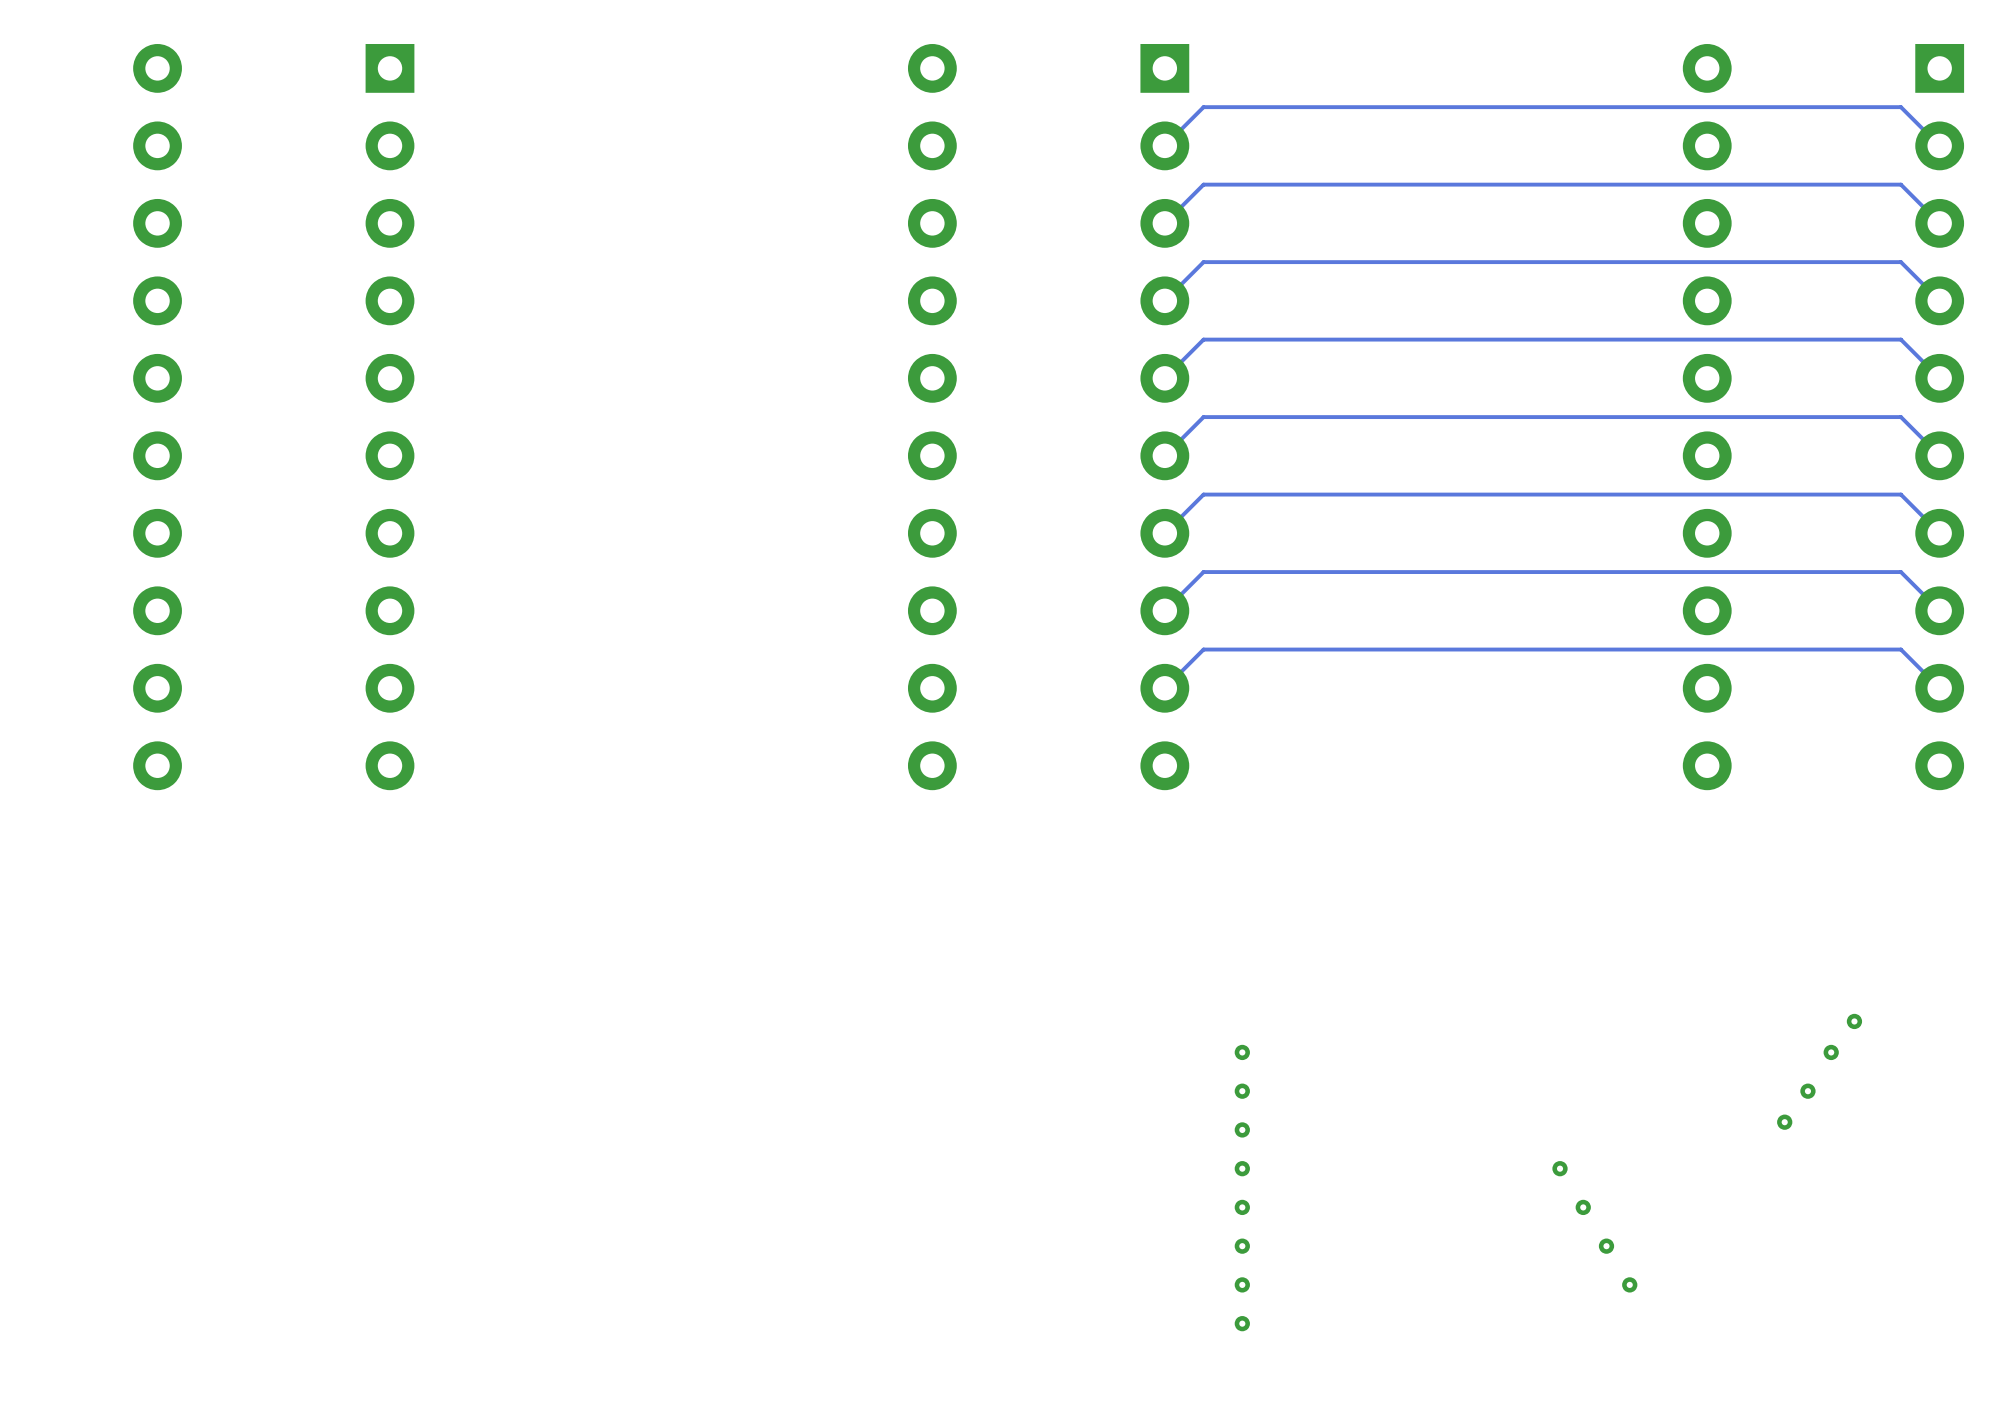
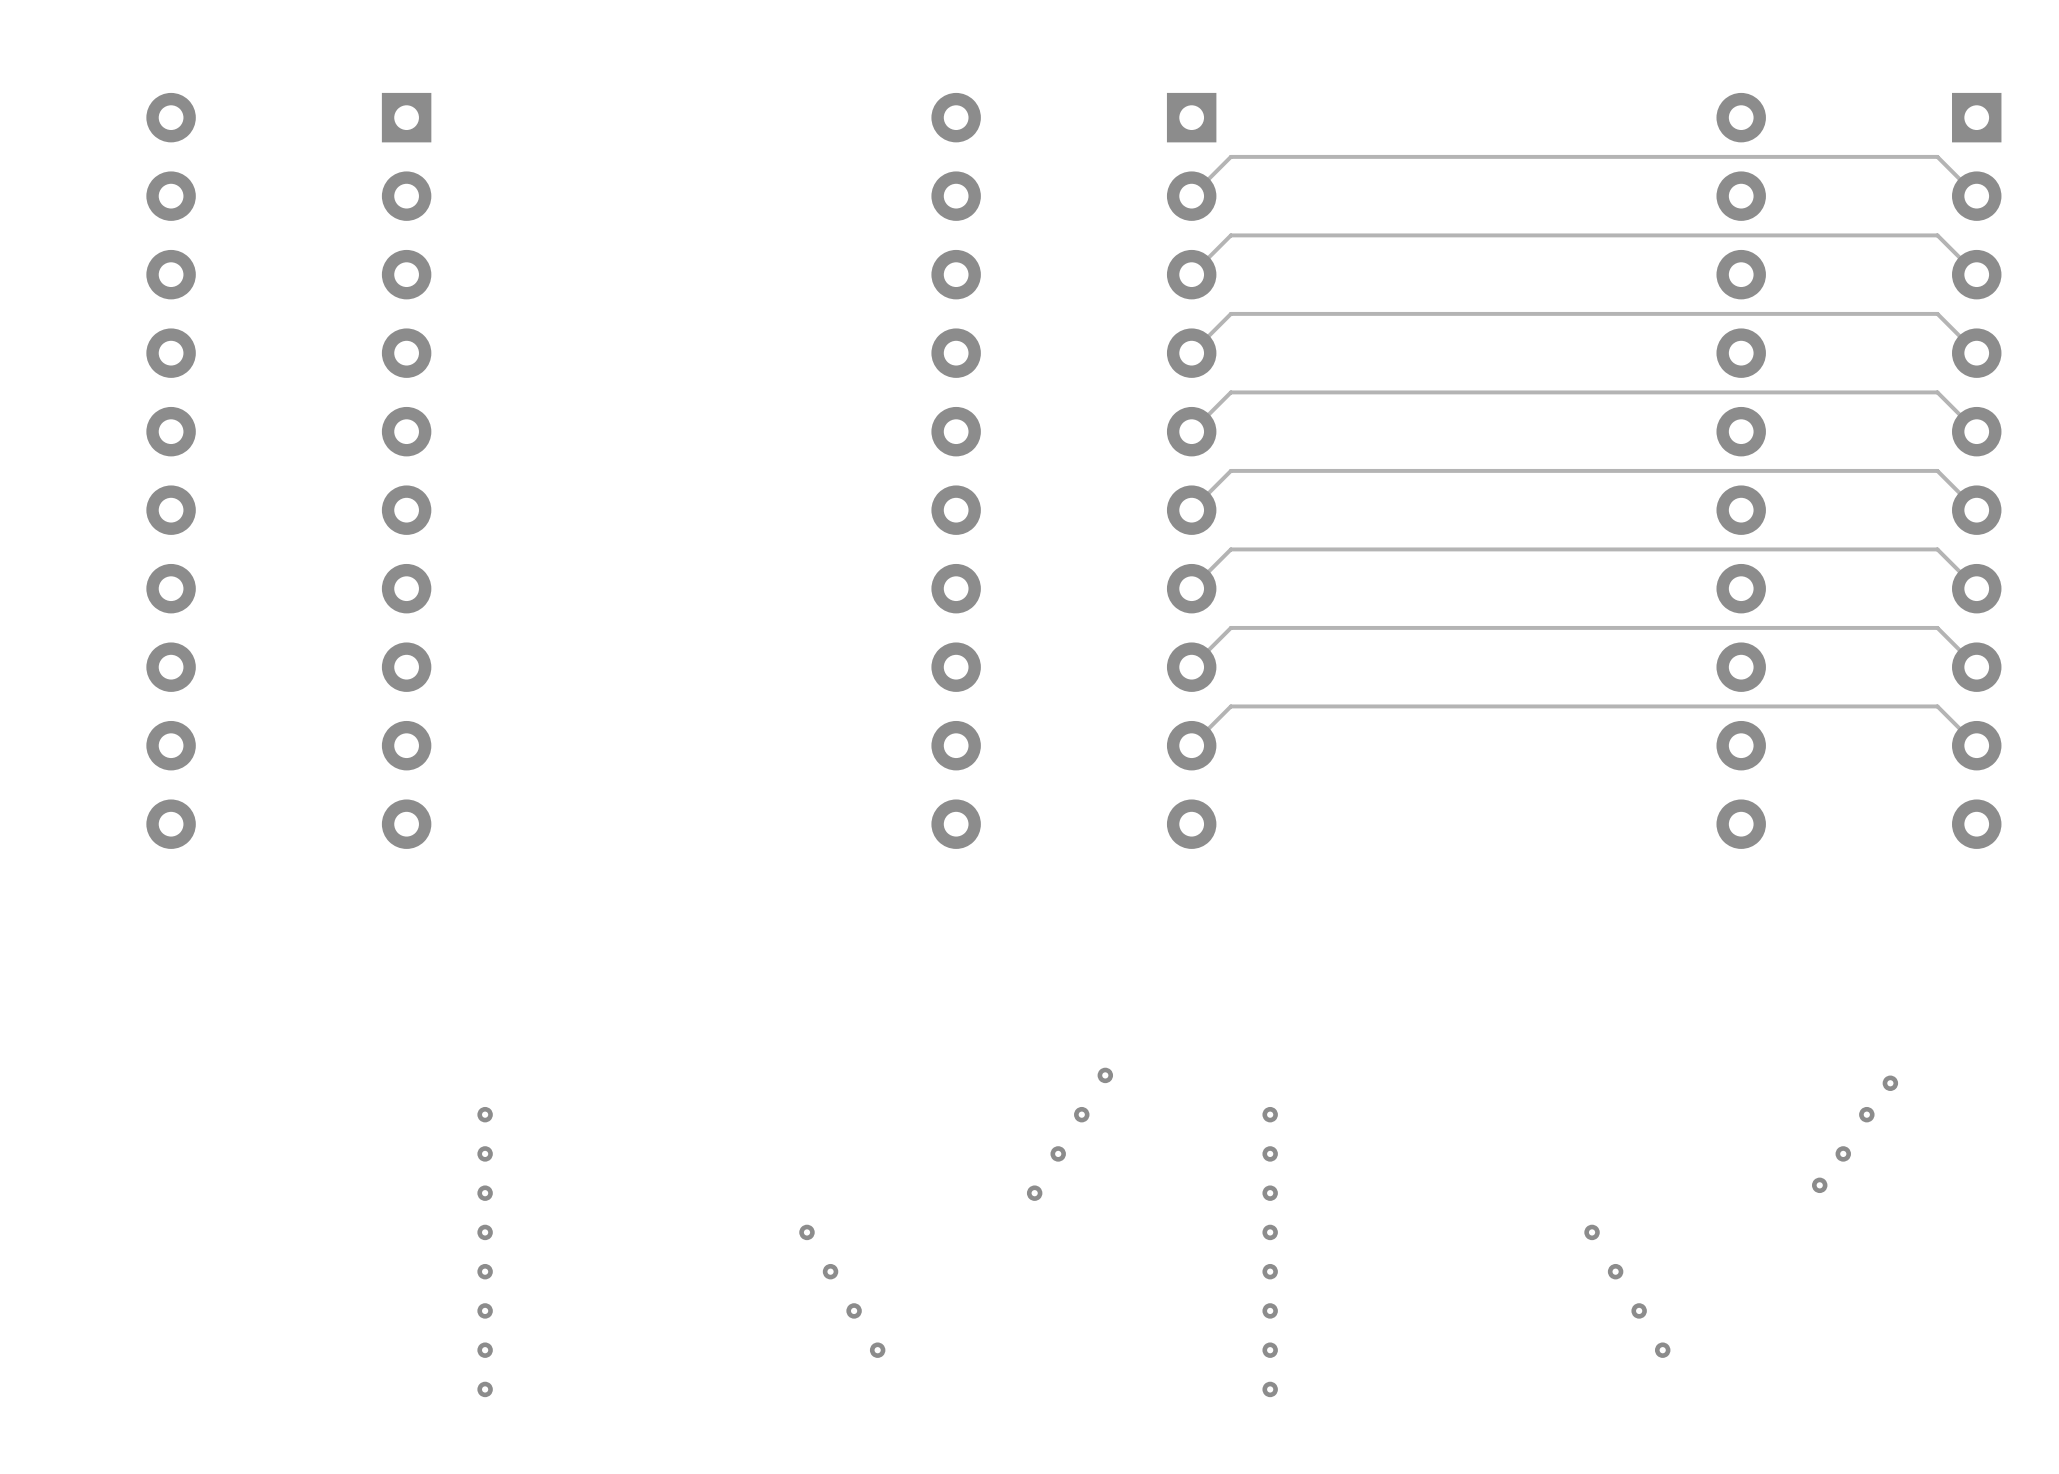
via: none -> (1105, 1075)
via: none -> (485, 1114)
via: none -> (1081, 1114)
via: none -> (485, 1153)
via: none -> (1058, 1153)
via: none -> (485, 1193)
via: none -> (1034, 1193)
via: none -> (485, 1232)
via: none -> (806, 1232)
via: none -> (485, 1271)
via: none -> (830, 1271)
via: none -> (485, 1310)
via: none -> (854, 1310)
via: none -> (485, 1350)
via: none -> (877, 1350)
via: none -> (485, 1389)

